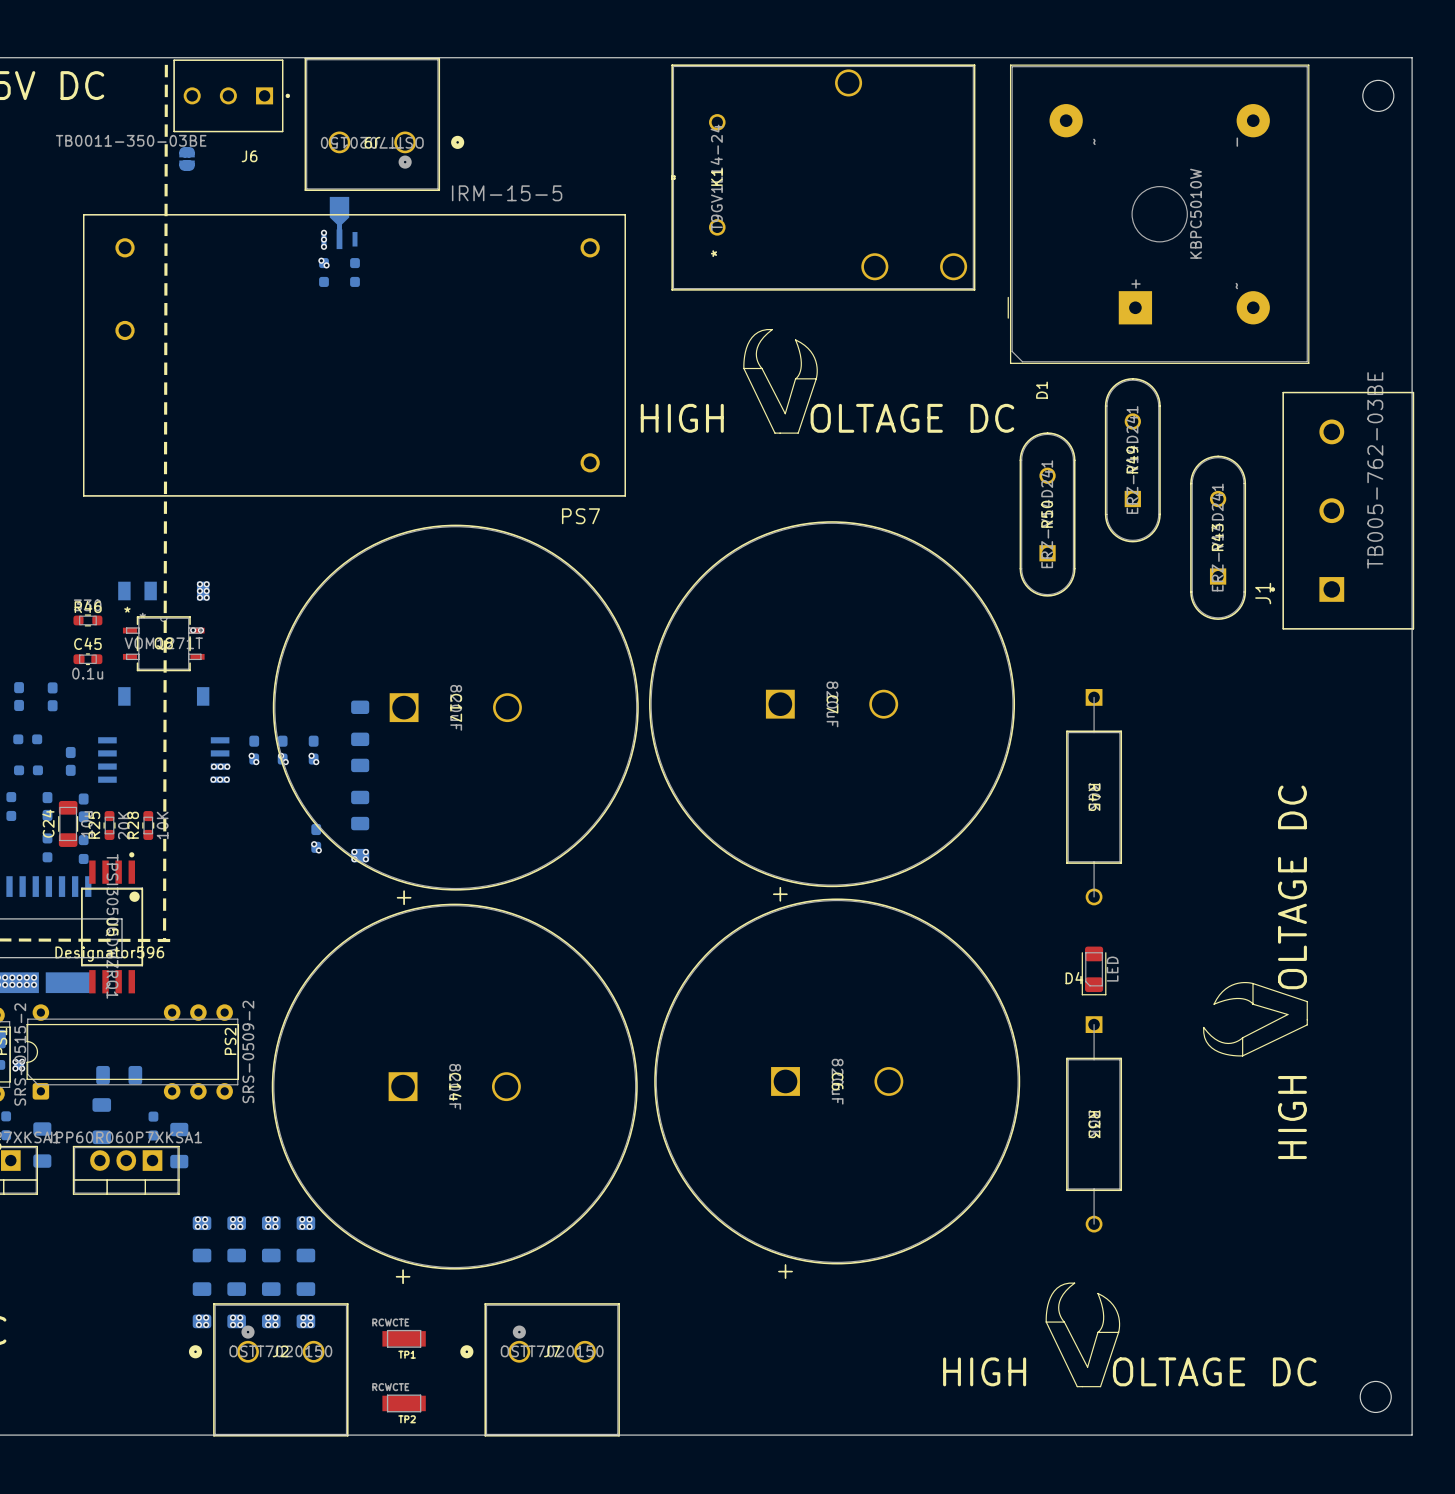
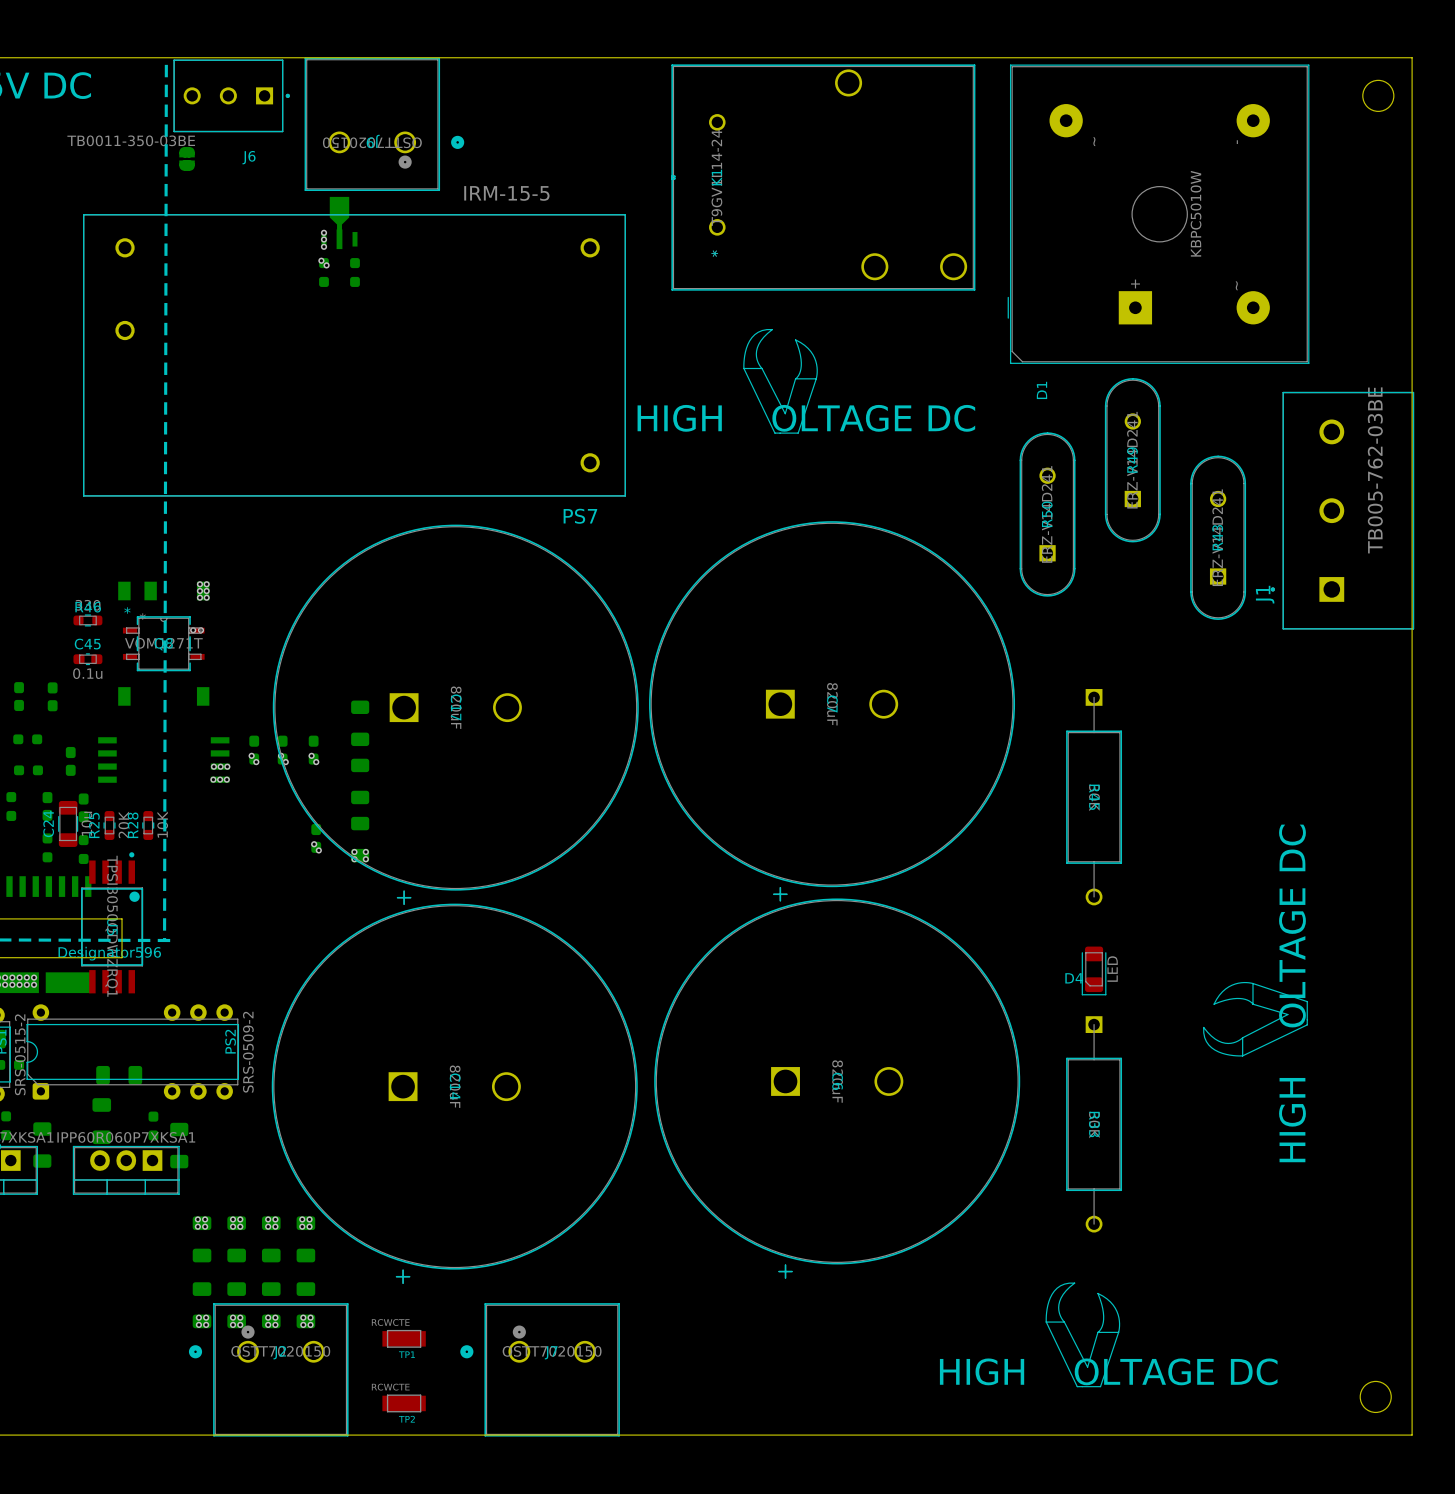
via: (15, 1061) -> none
via: (22, 1061) -> none
via: (15, 1068) -> none
via: (22, 1068) -> none

